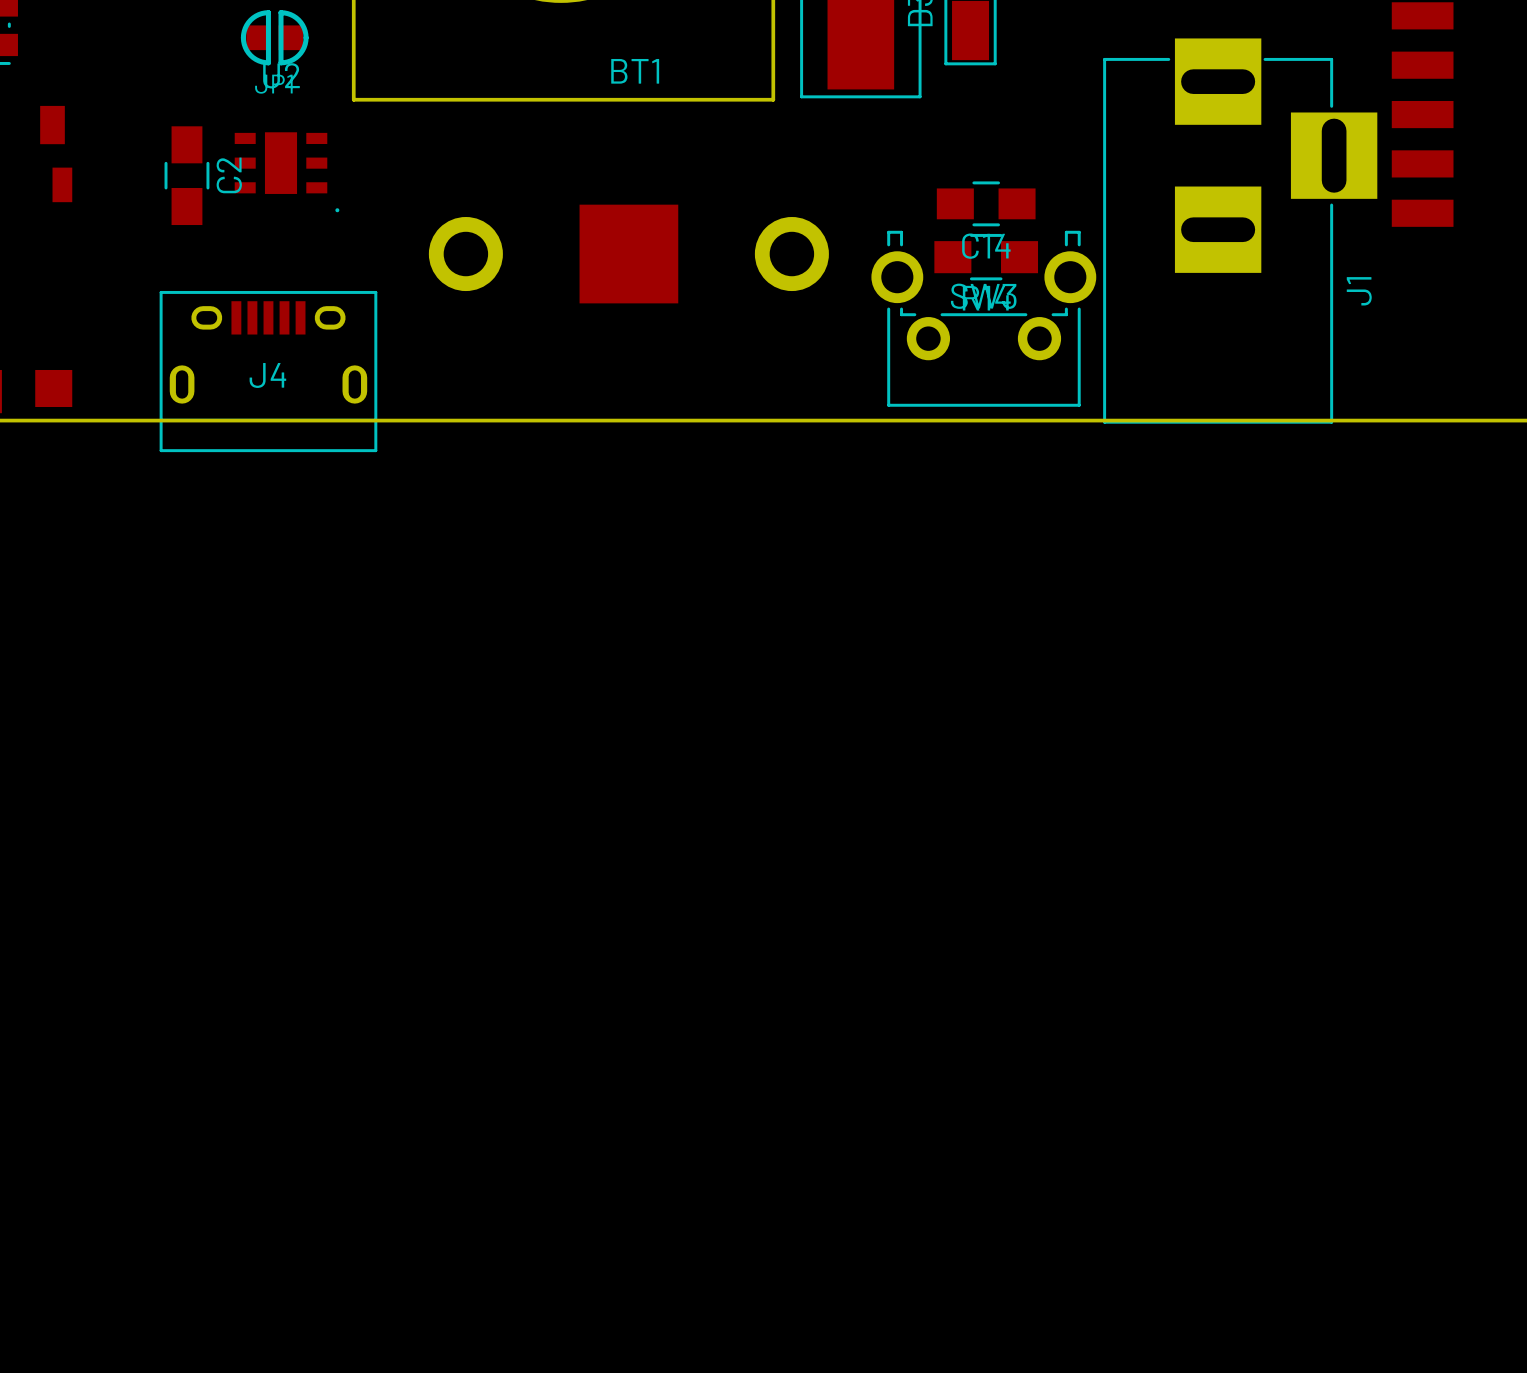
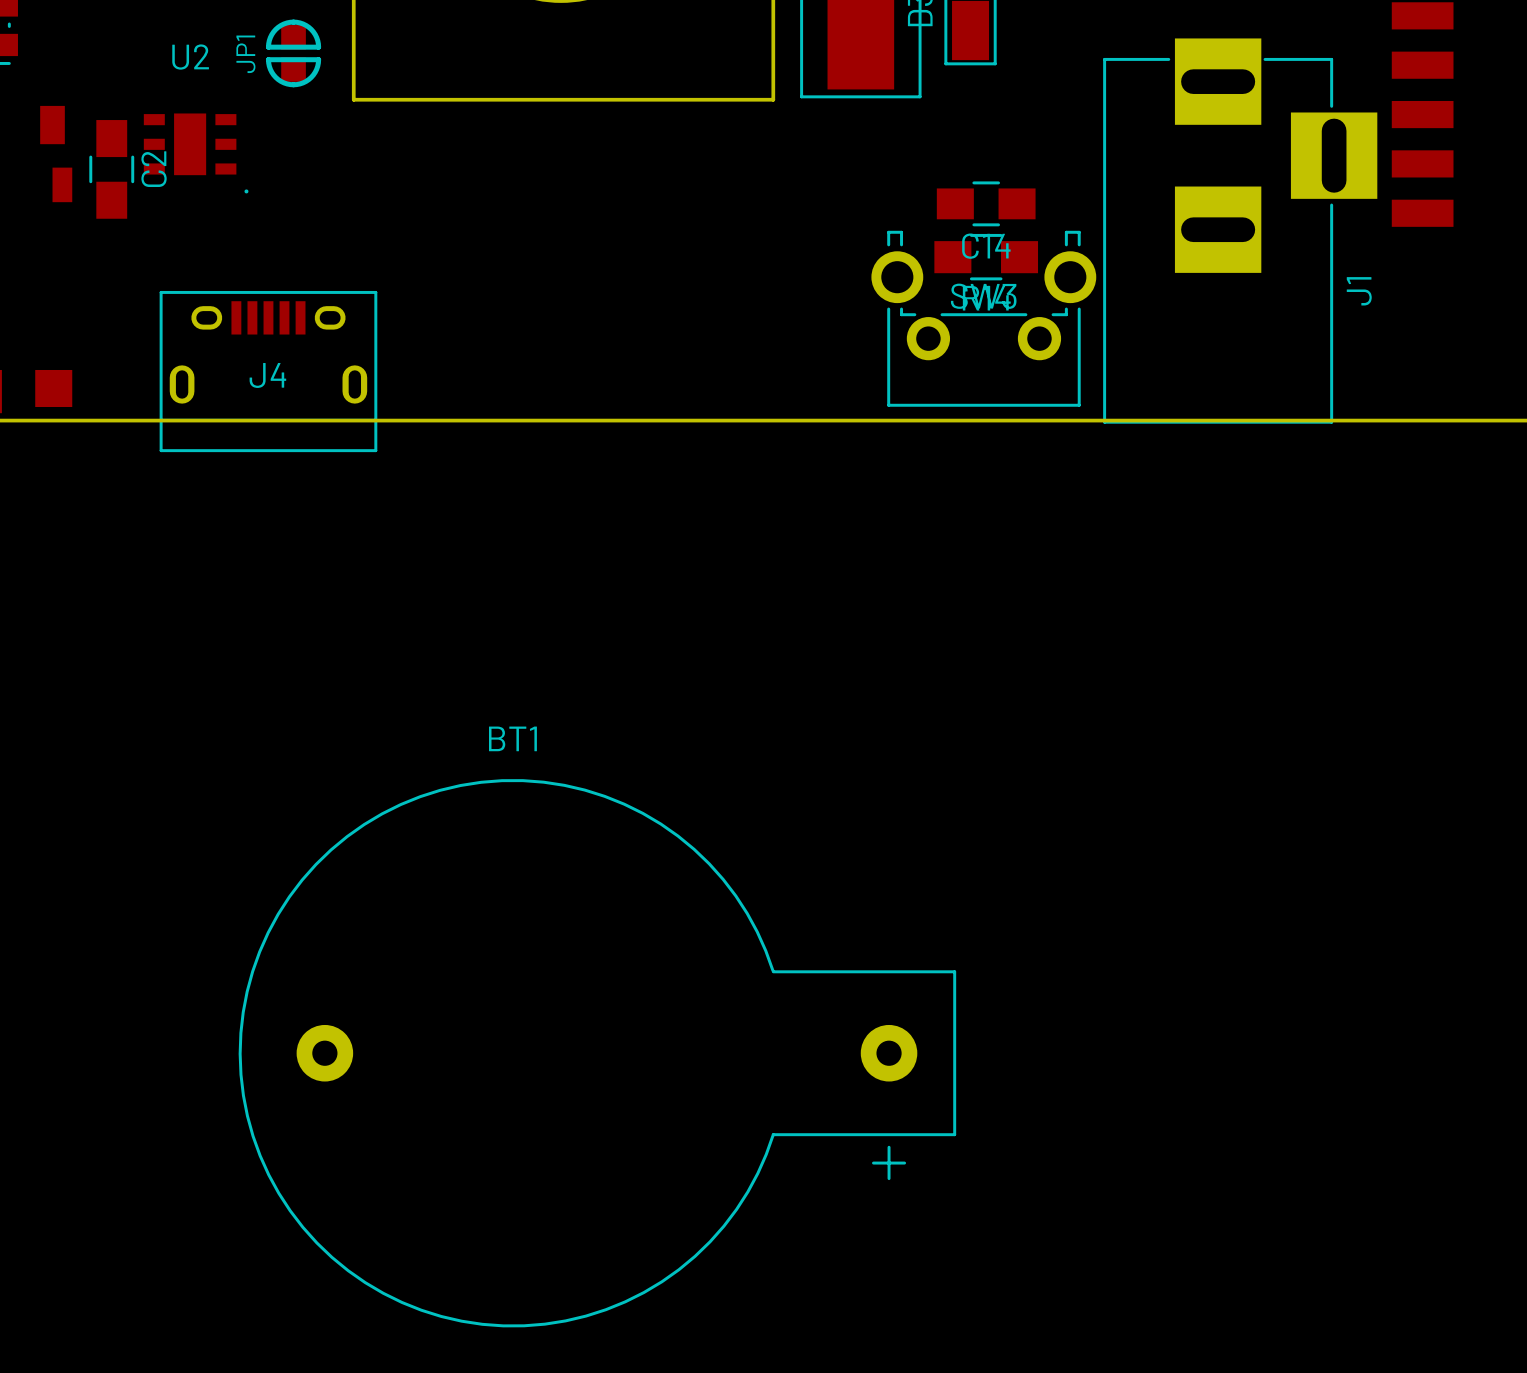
JP1 rotation: 0° (274, 37) -> 90° clockwise (293, 53)
BT1 name position: BT1 (635, 71) -> BT1 (512, 738)
U2 position: (281, 163) -> (190, 144)
C2 position: (186, 175) -> (111, 169)
BT1 footprint: [428, 204, 829, 304] -> [238, 779, 957, 1328]

